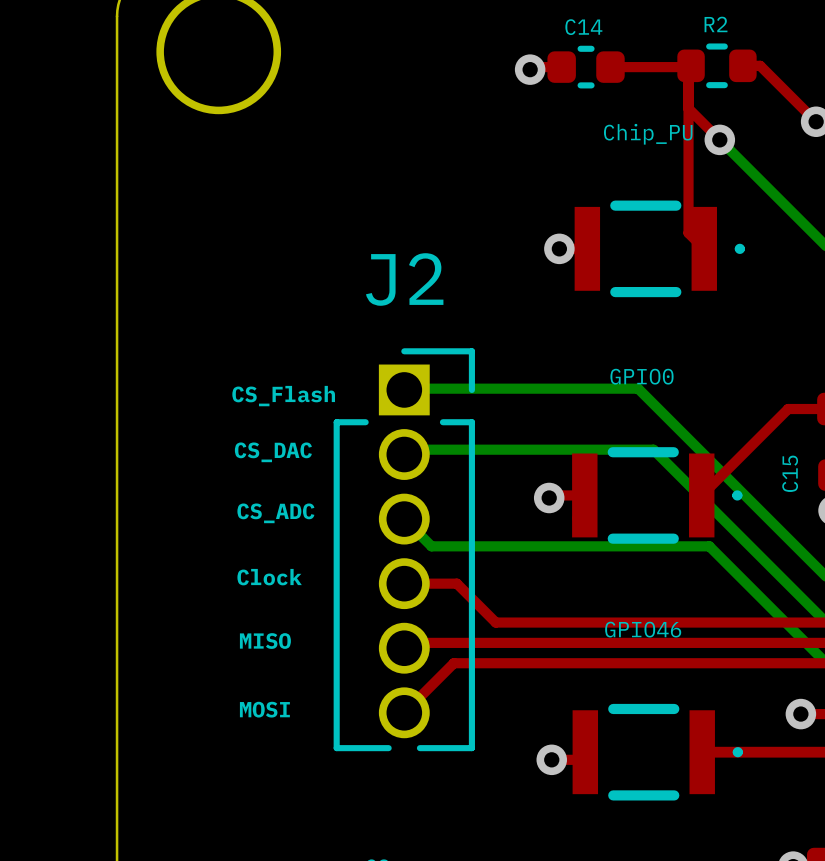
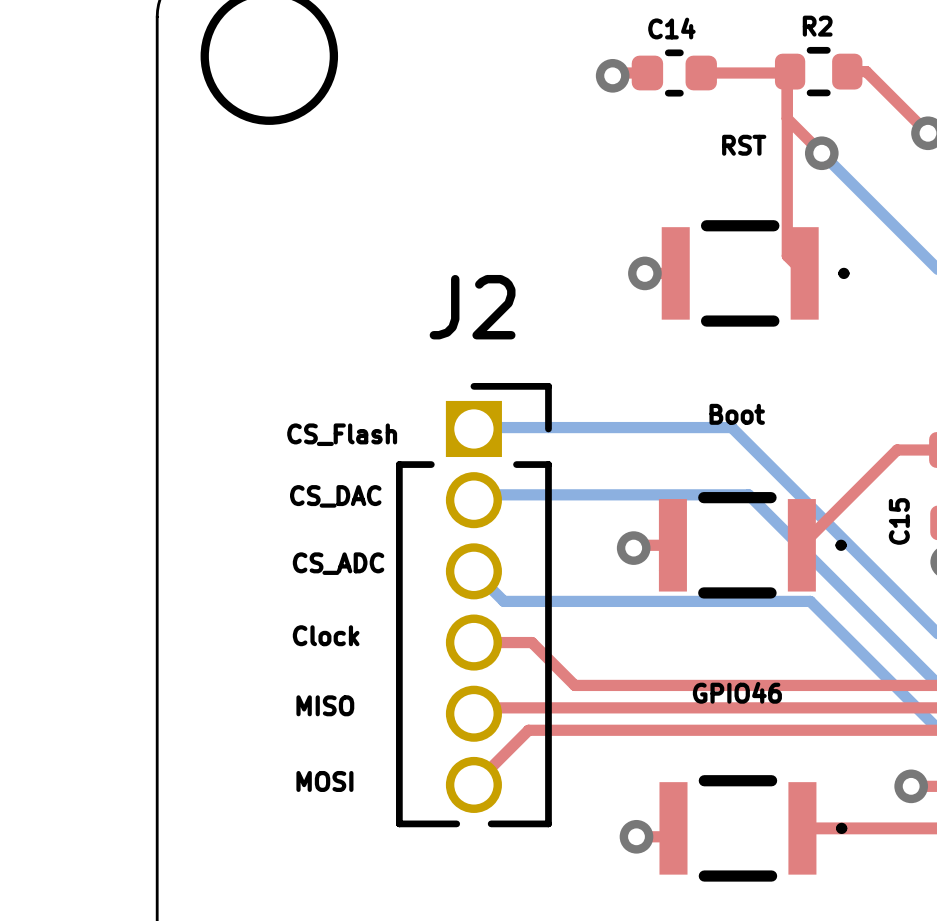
Chip_PU name: Chip_PU (648, 134) -> RST (744, 145)
GPIO0 name: GPIO0 (641, 376) -> Boot (737, 414)

